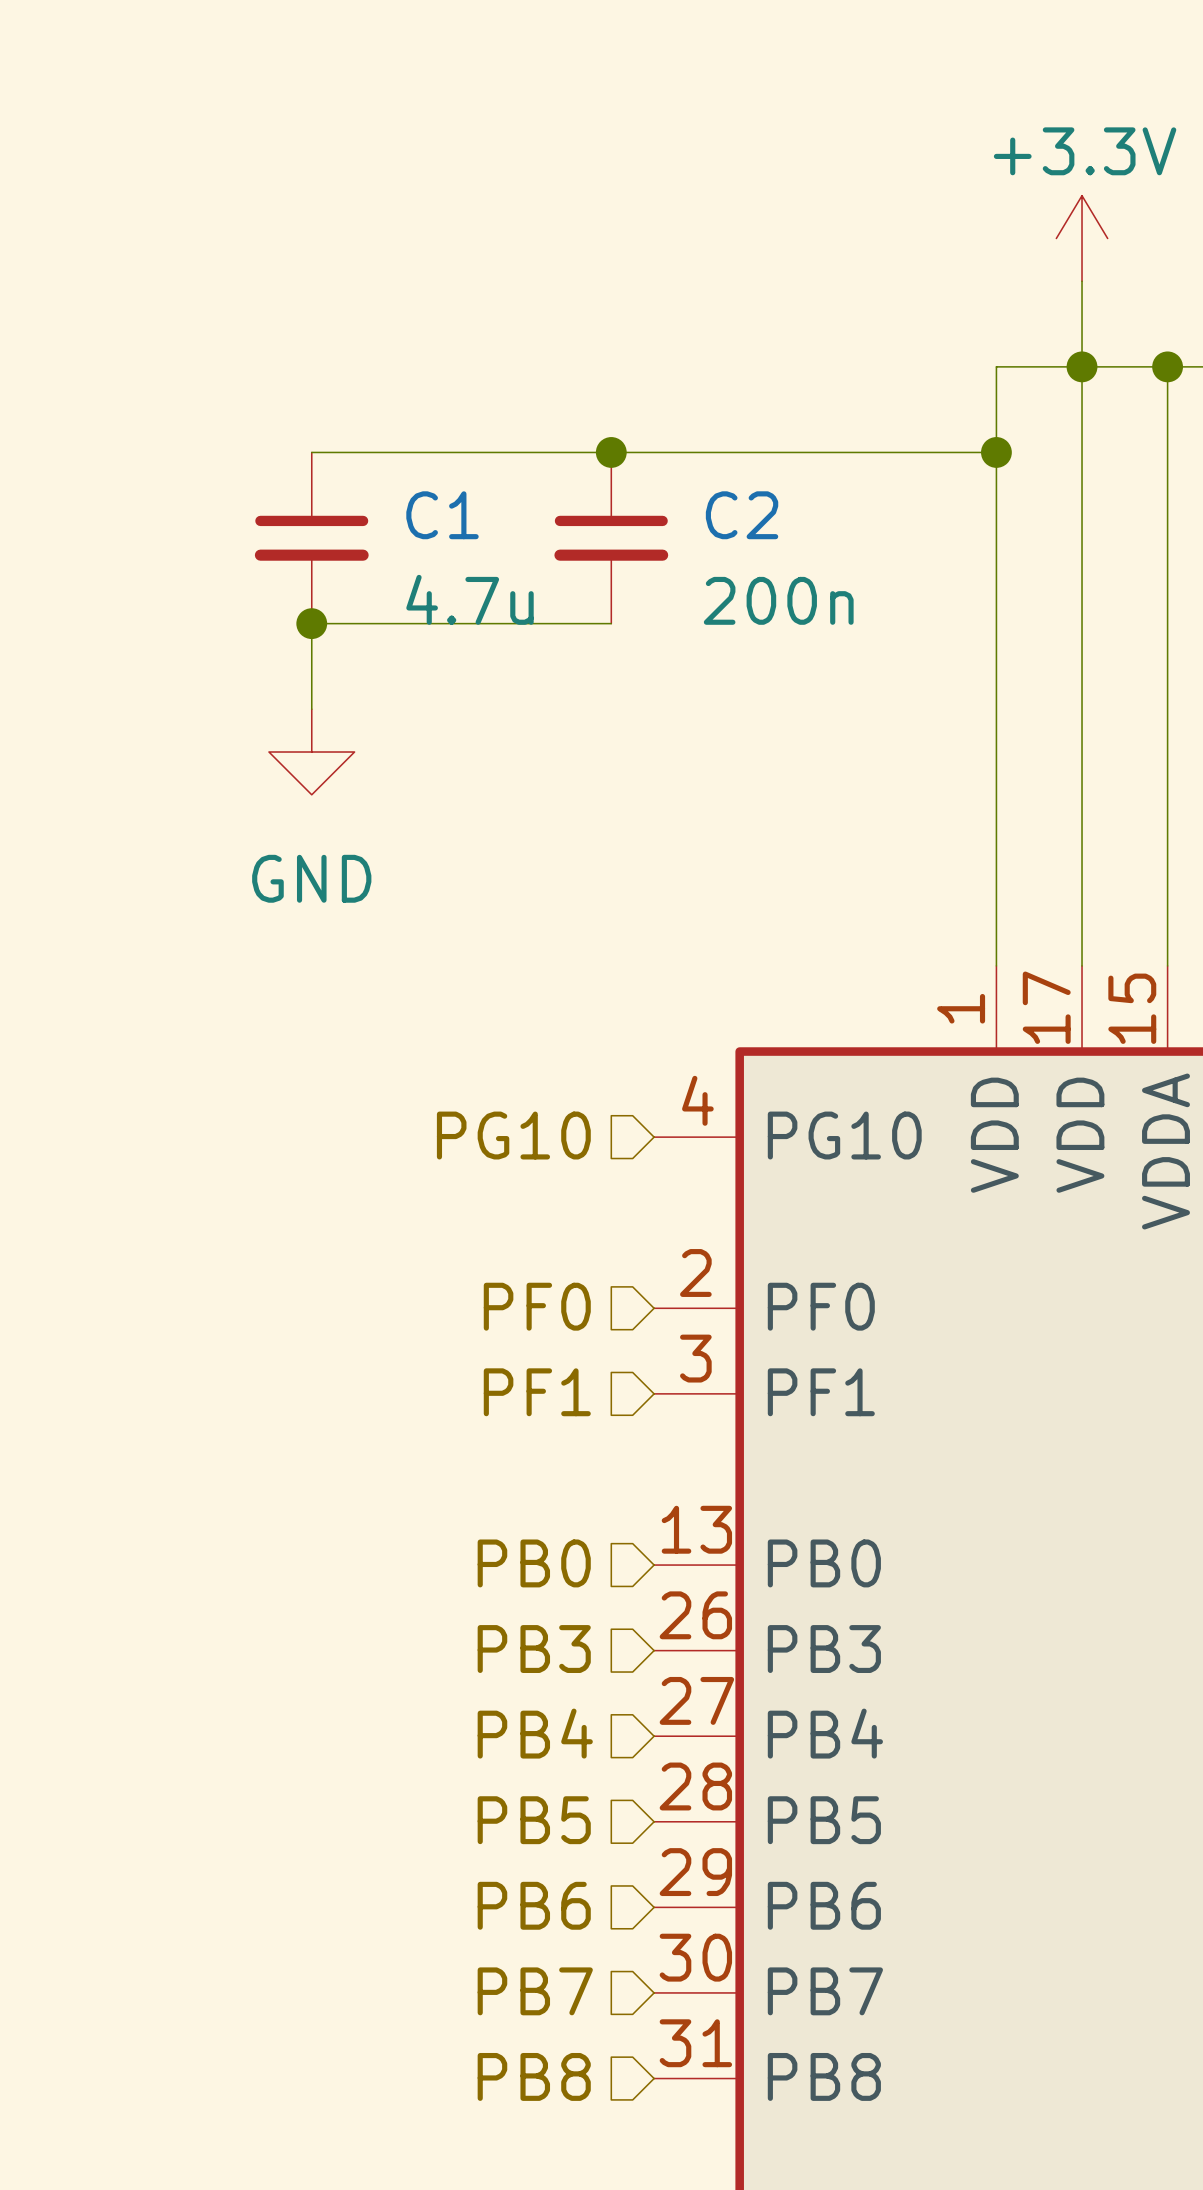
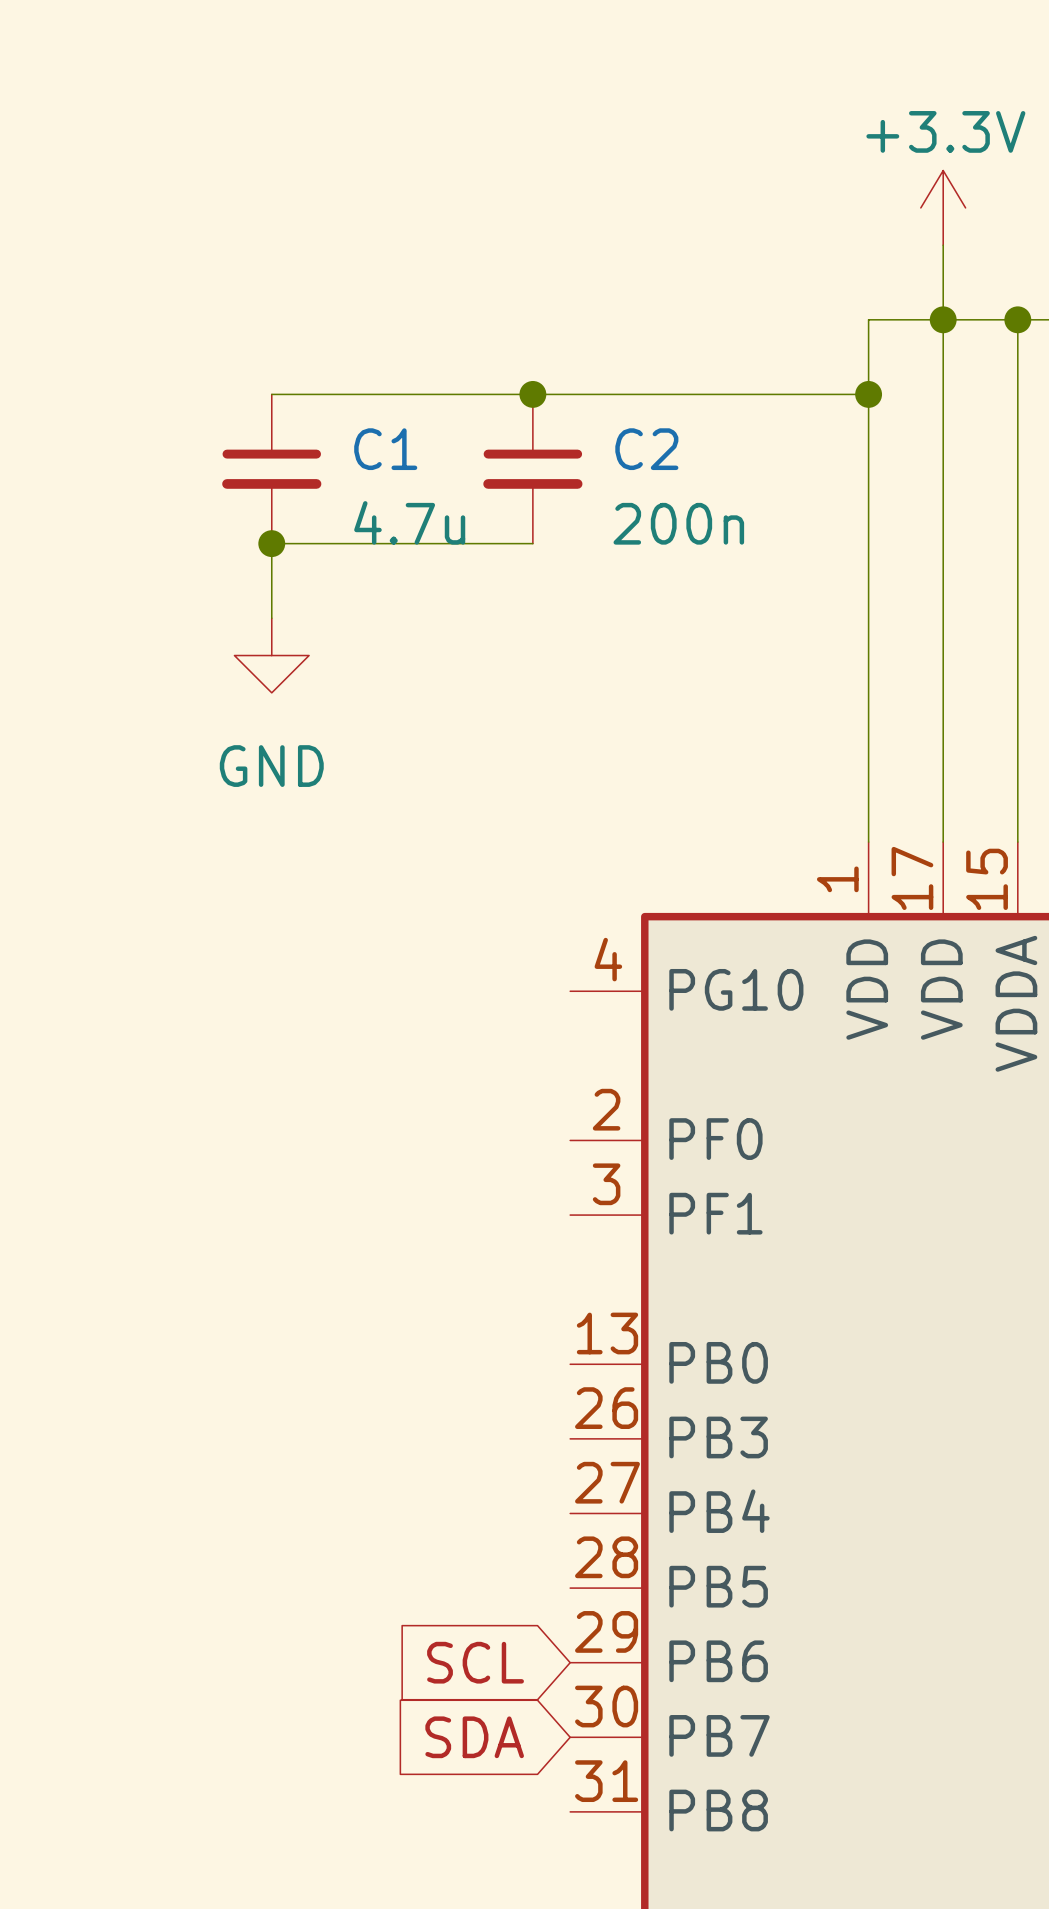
hierarchical label: PG10 (513, 1135) -> none
hierarchical label: PF0 (537, 1306) -> none
hierarchical label: PF1 (537, 1392) -> none
hierarchical label: PB0 (534, 1563) -> none
hierarchical label: PB3 (534, 1649) -> none
hierarchical label: PB4 (535, 1733) -> none
hierarchical label: PB5 (534, 1820) -> none
hierarchical label: PB6 (534, 1905) -> none
global label: none -> SCL (475, 1662)
hierarchical label: PB7 (535, 1991) -> none
global label: none -> SDA (474, 1737)
hierarchical label: PB8 (534, 2076) -> none

